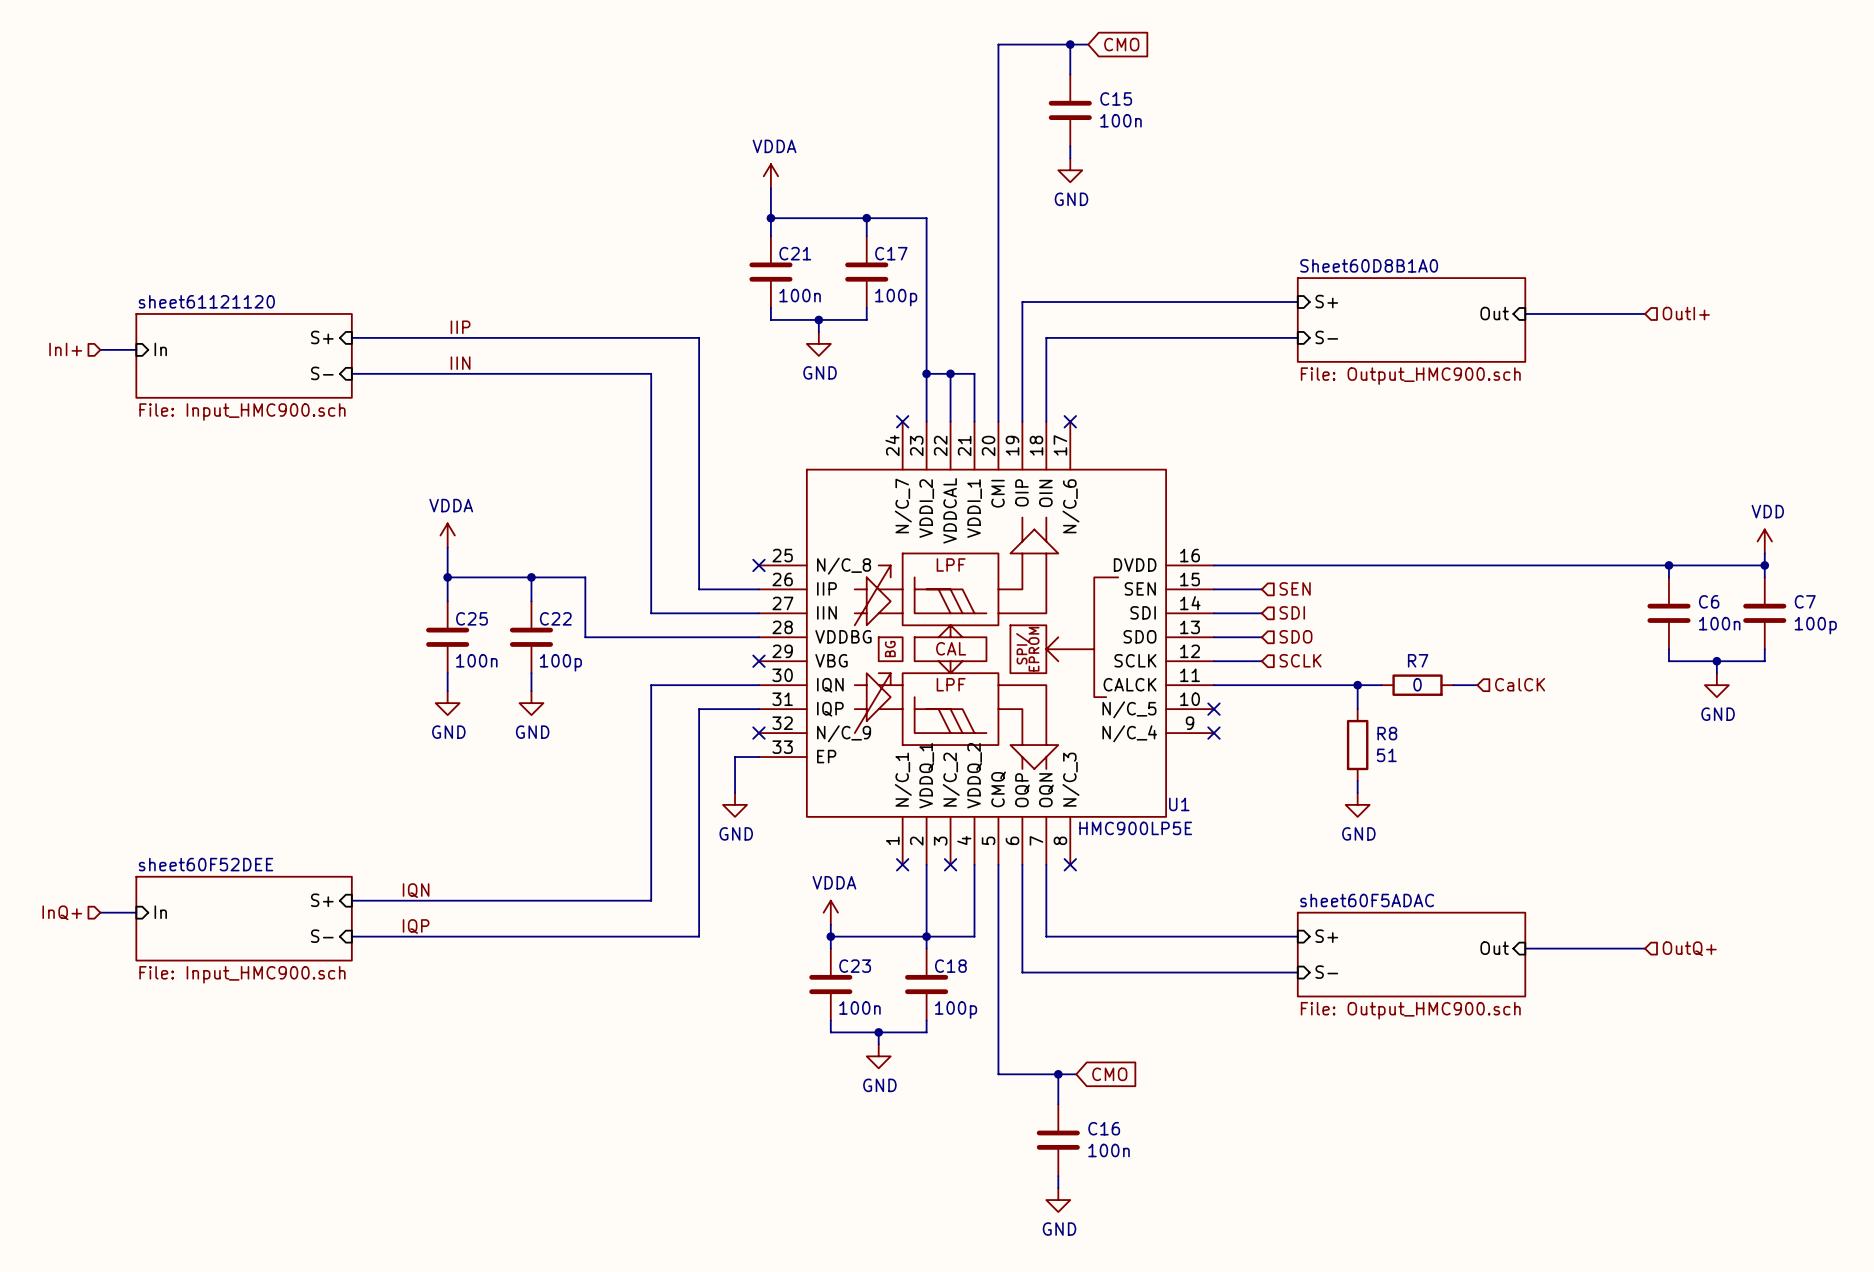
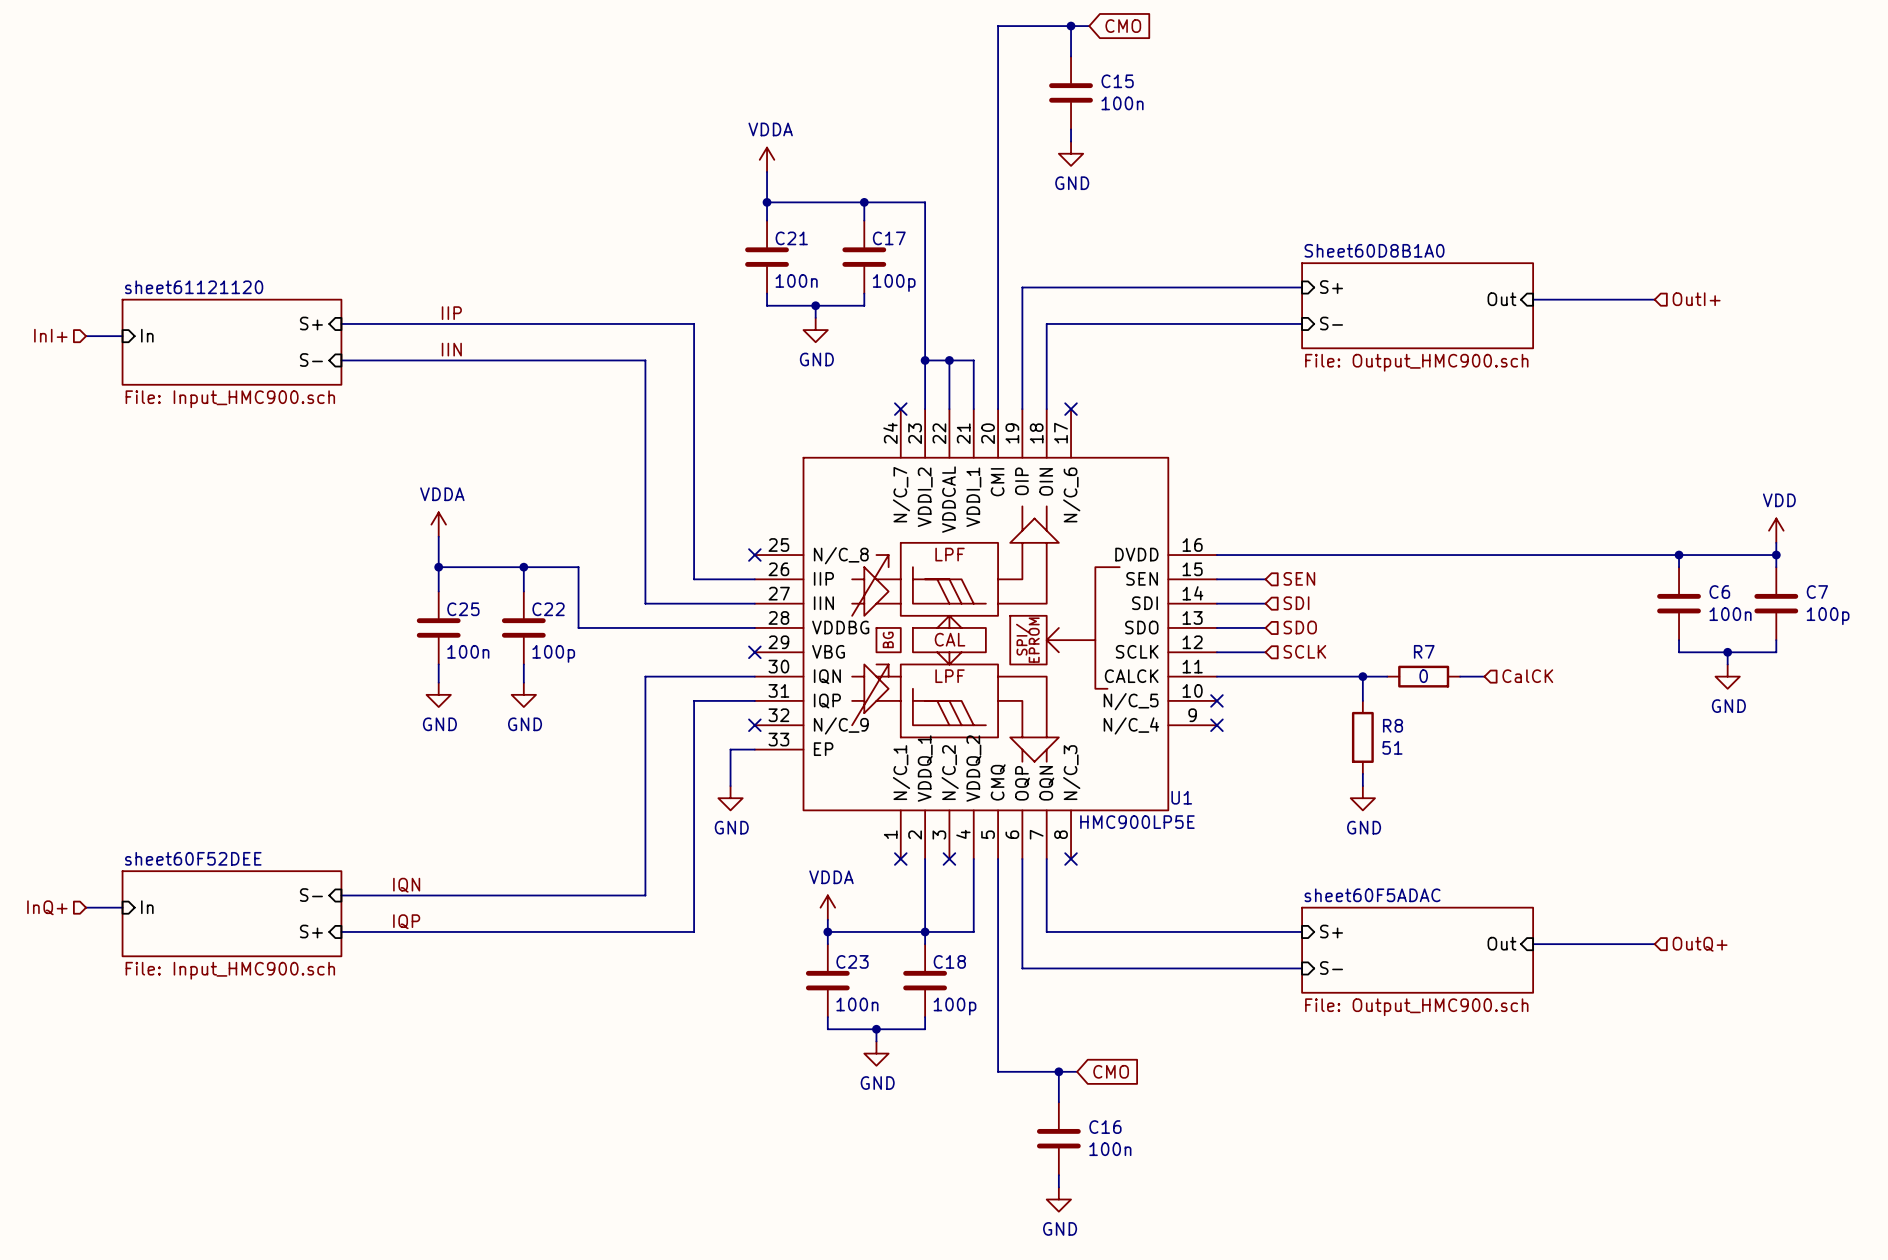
sheet pin: S+ (322, 900) -> S- (311, 895)
sheet pin: S- (322, 936) -> S+ (311, 931)

